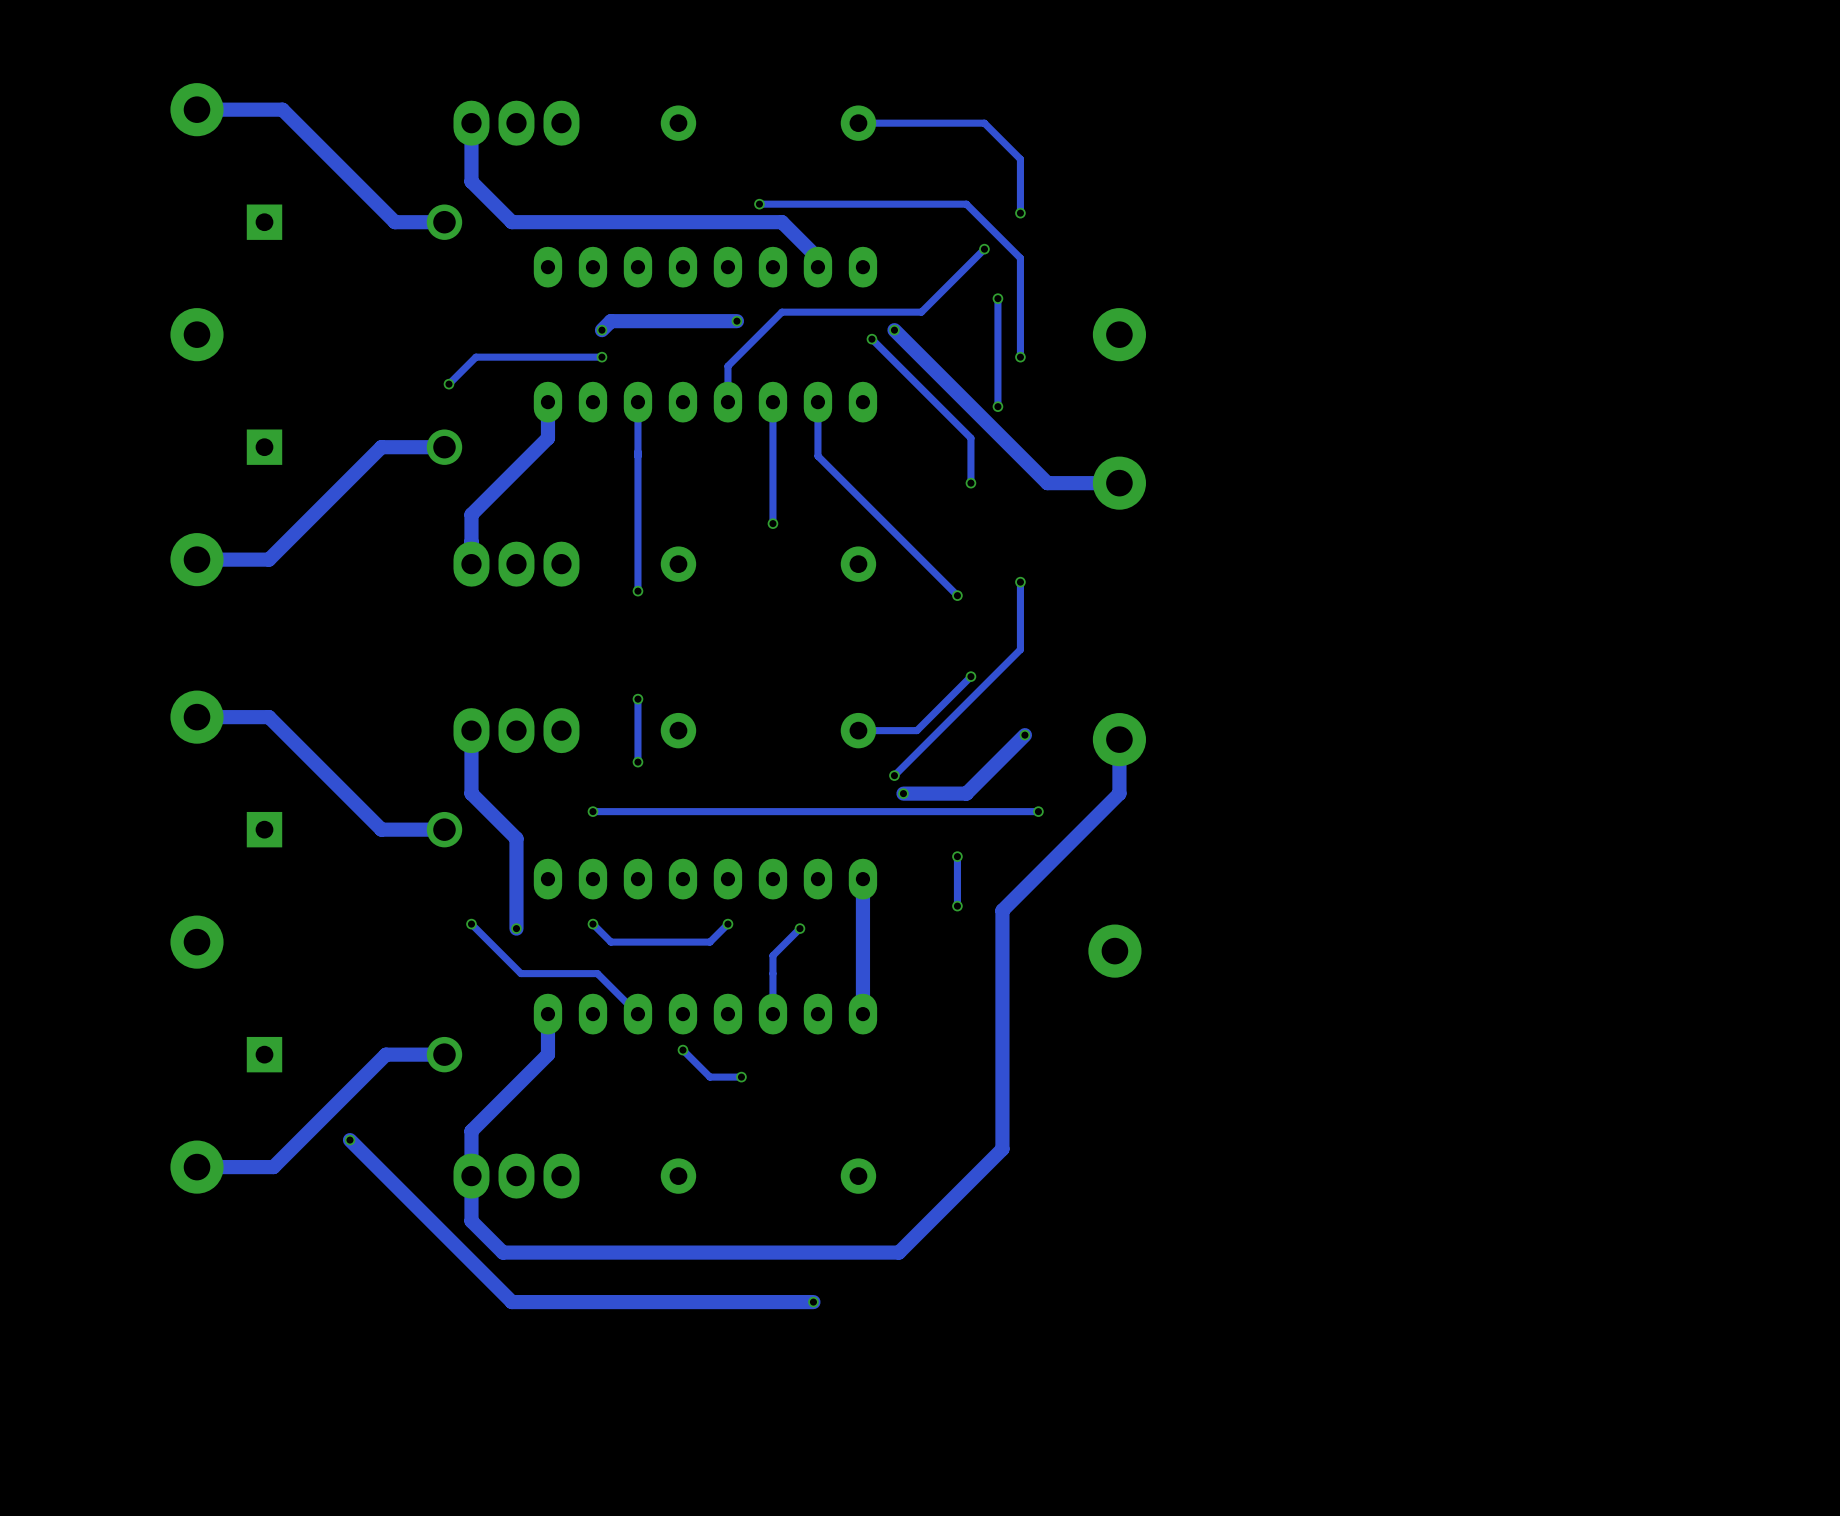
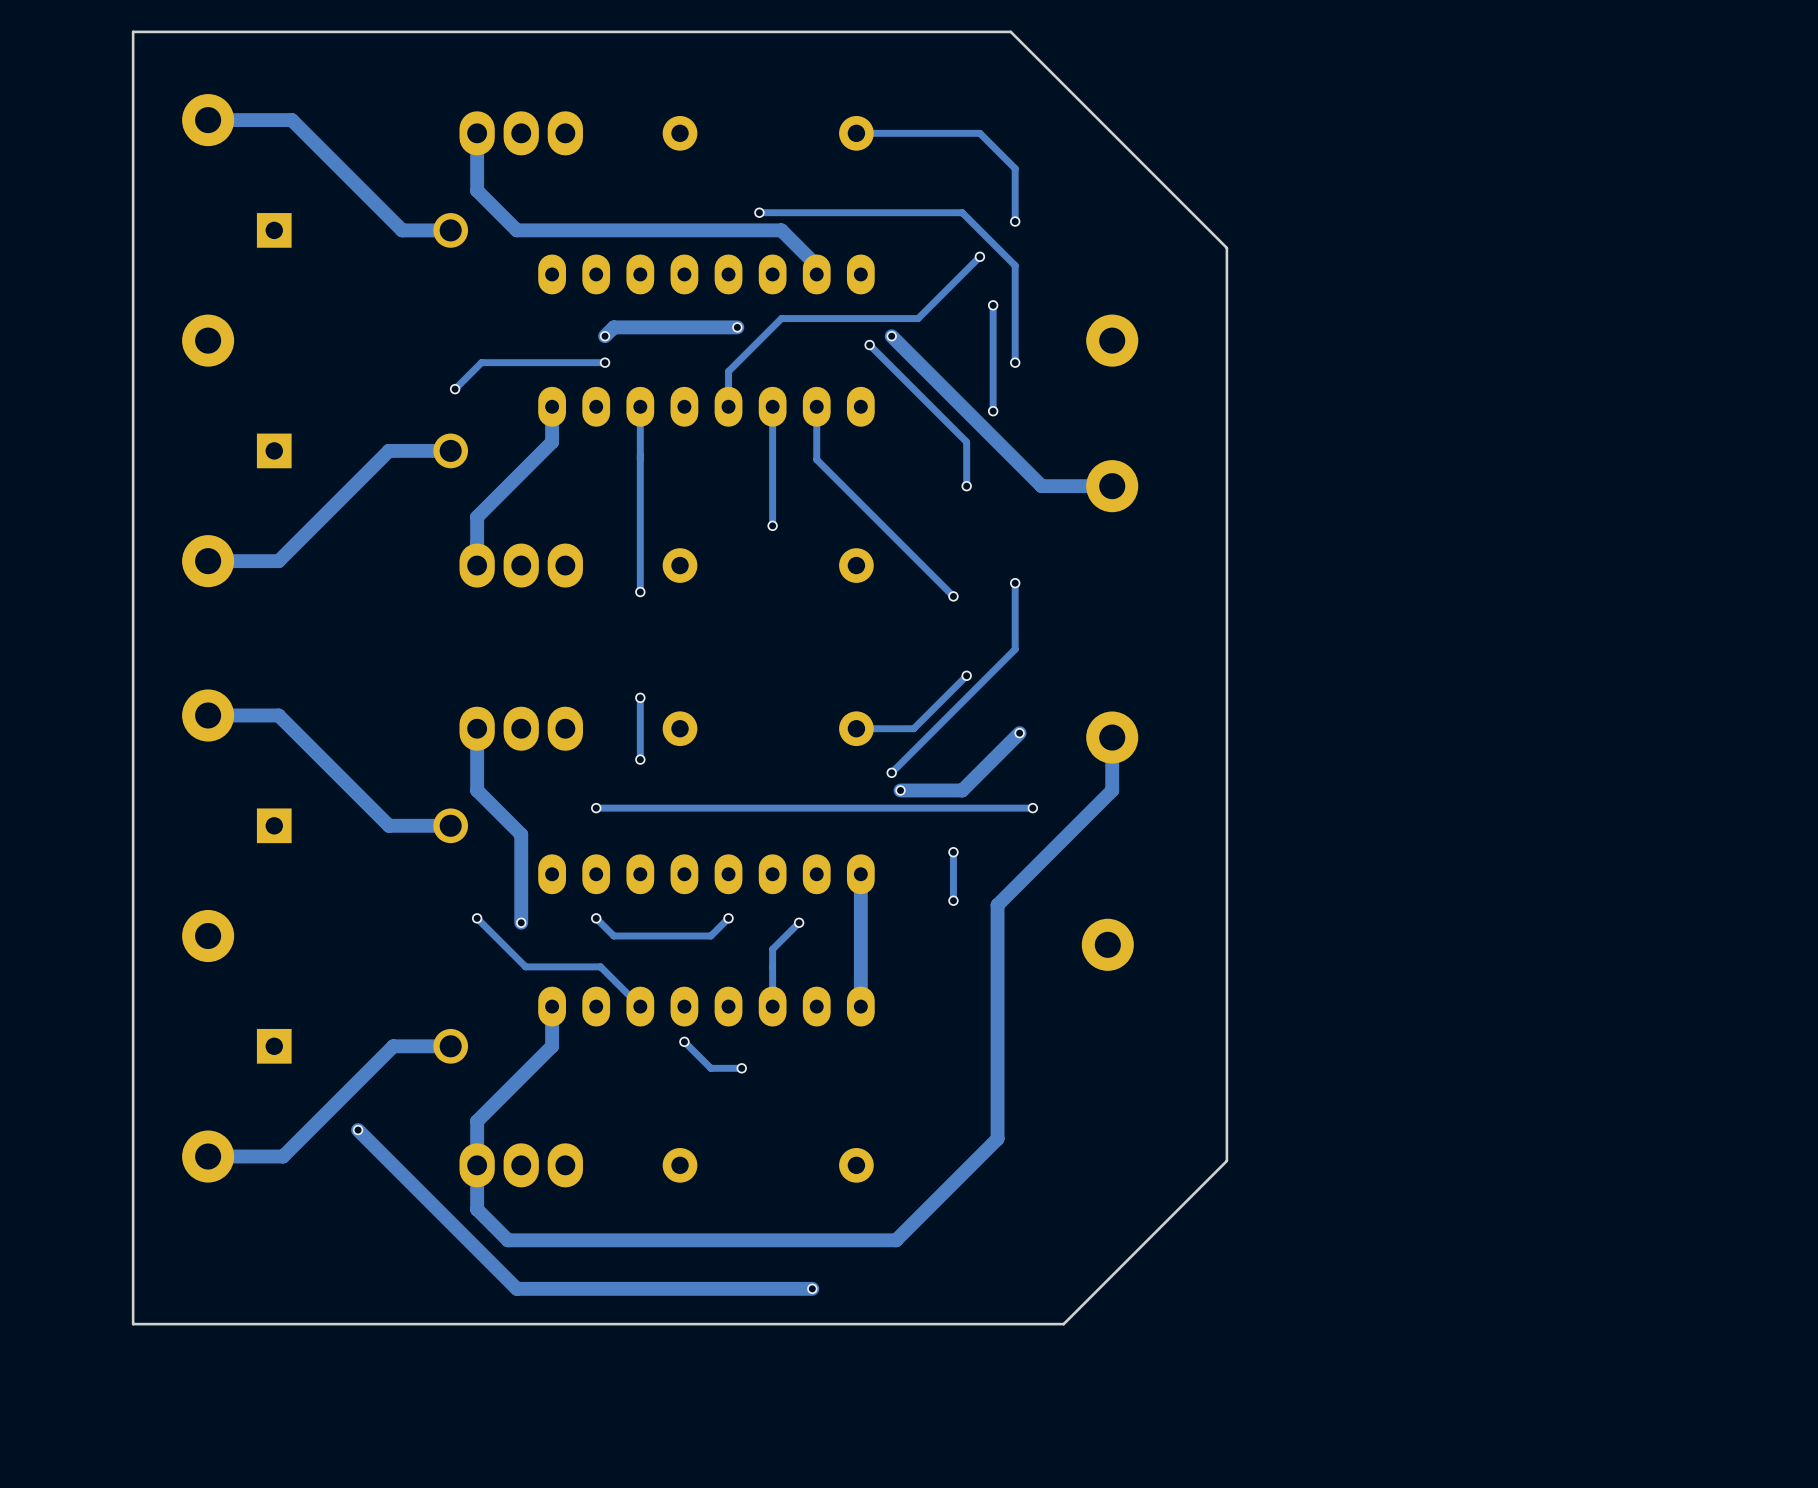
board edge: none -> (1010, 31) (1226, 248) (1226, 1160) (1063, 1324) (133, 1324) (133, 31) (1010, 31)

